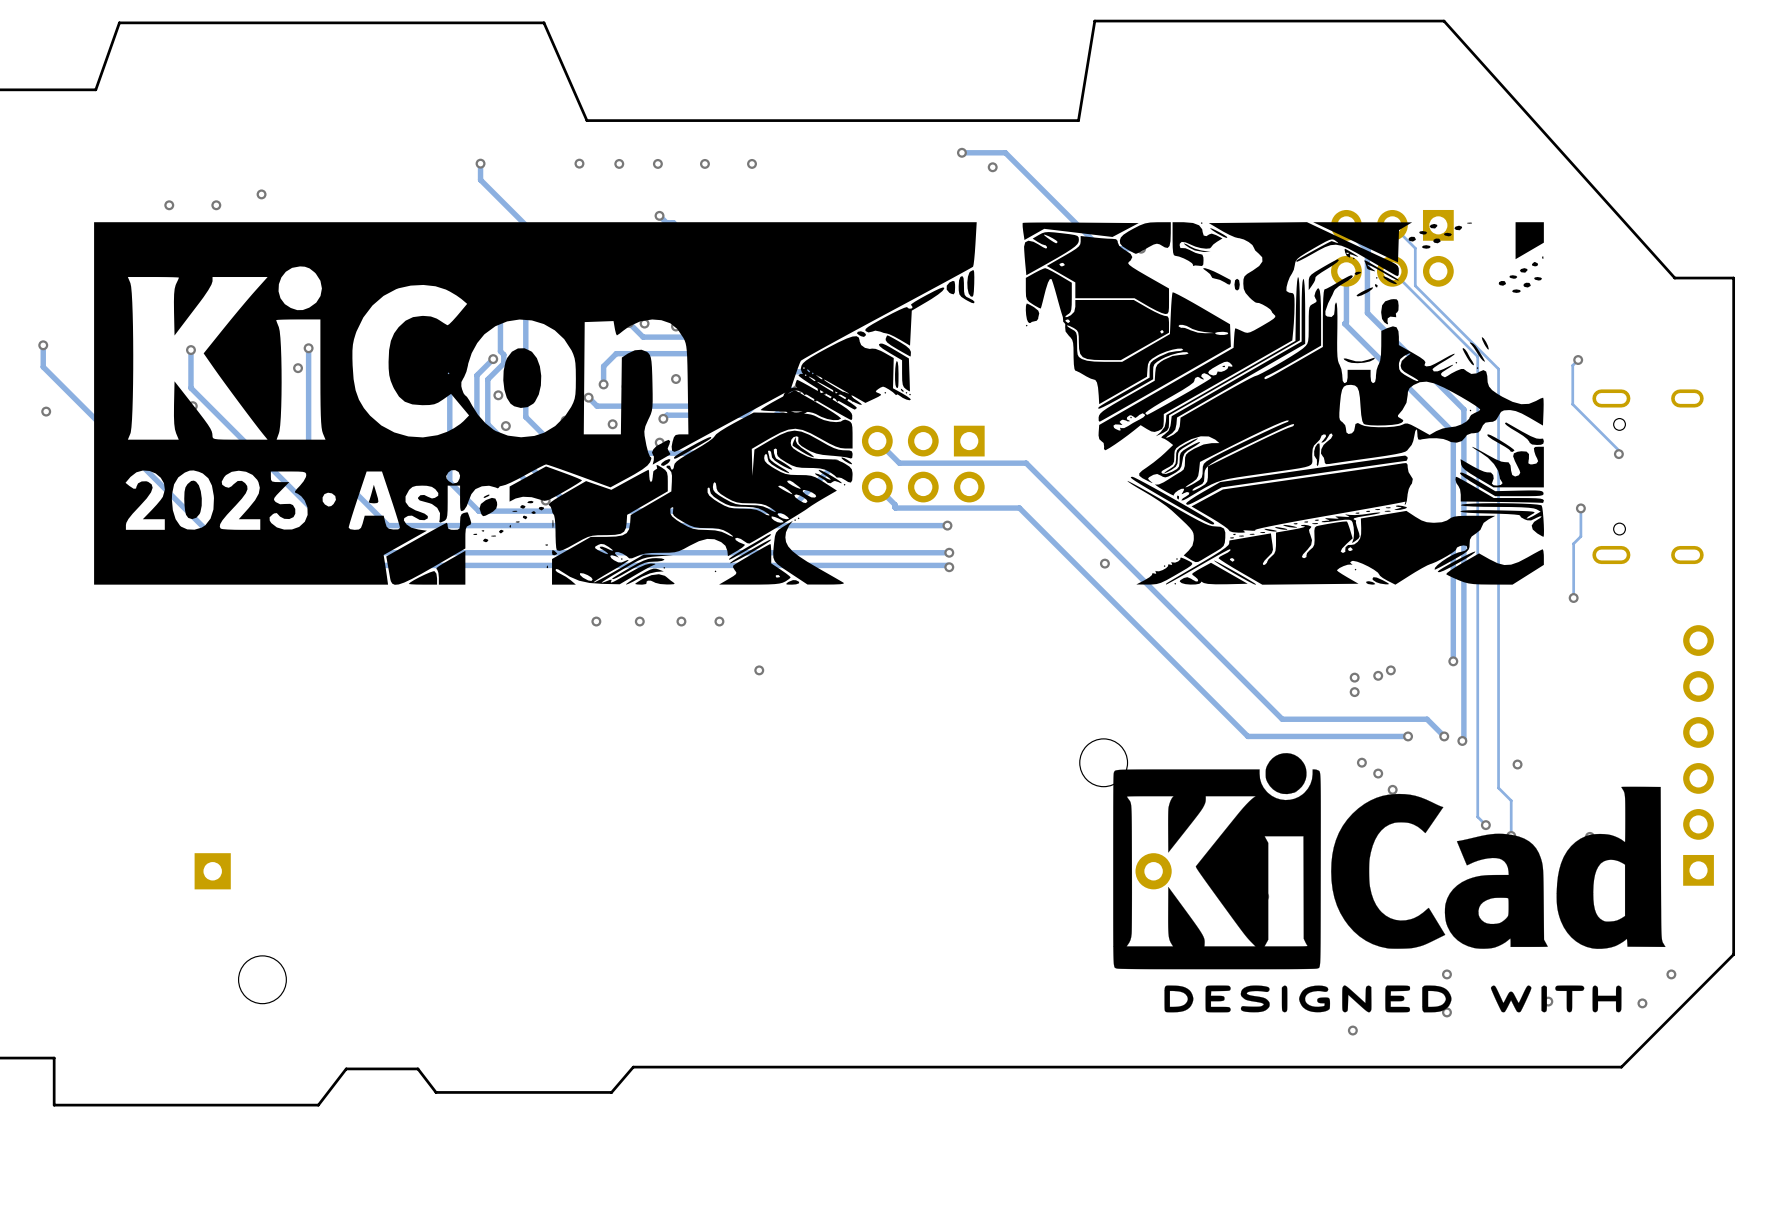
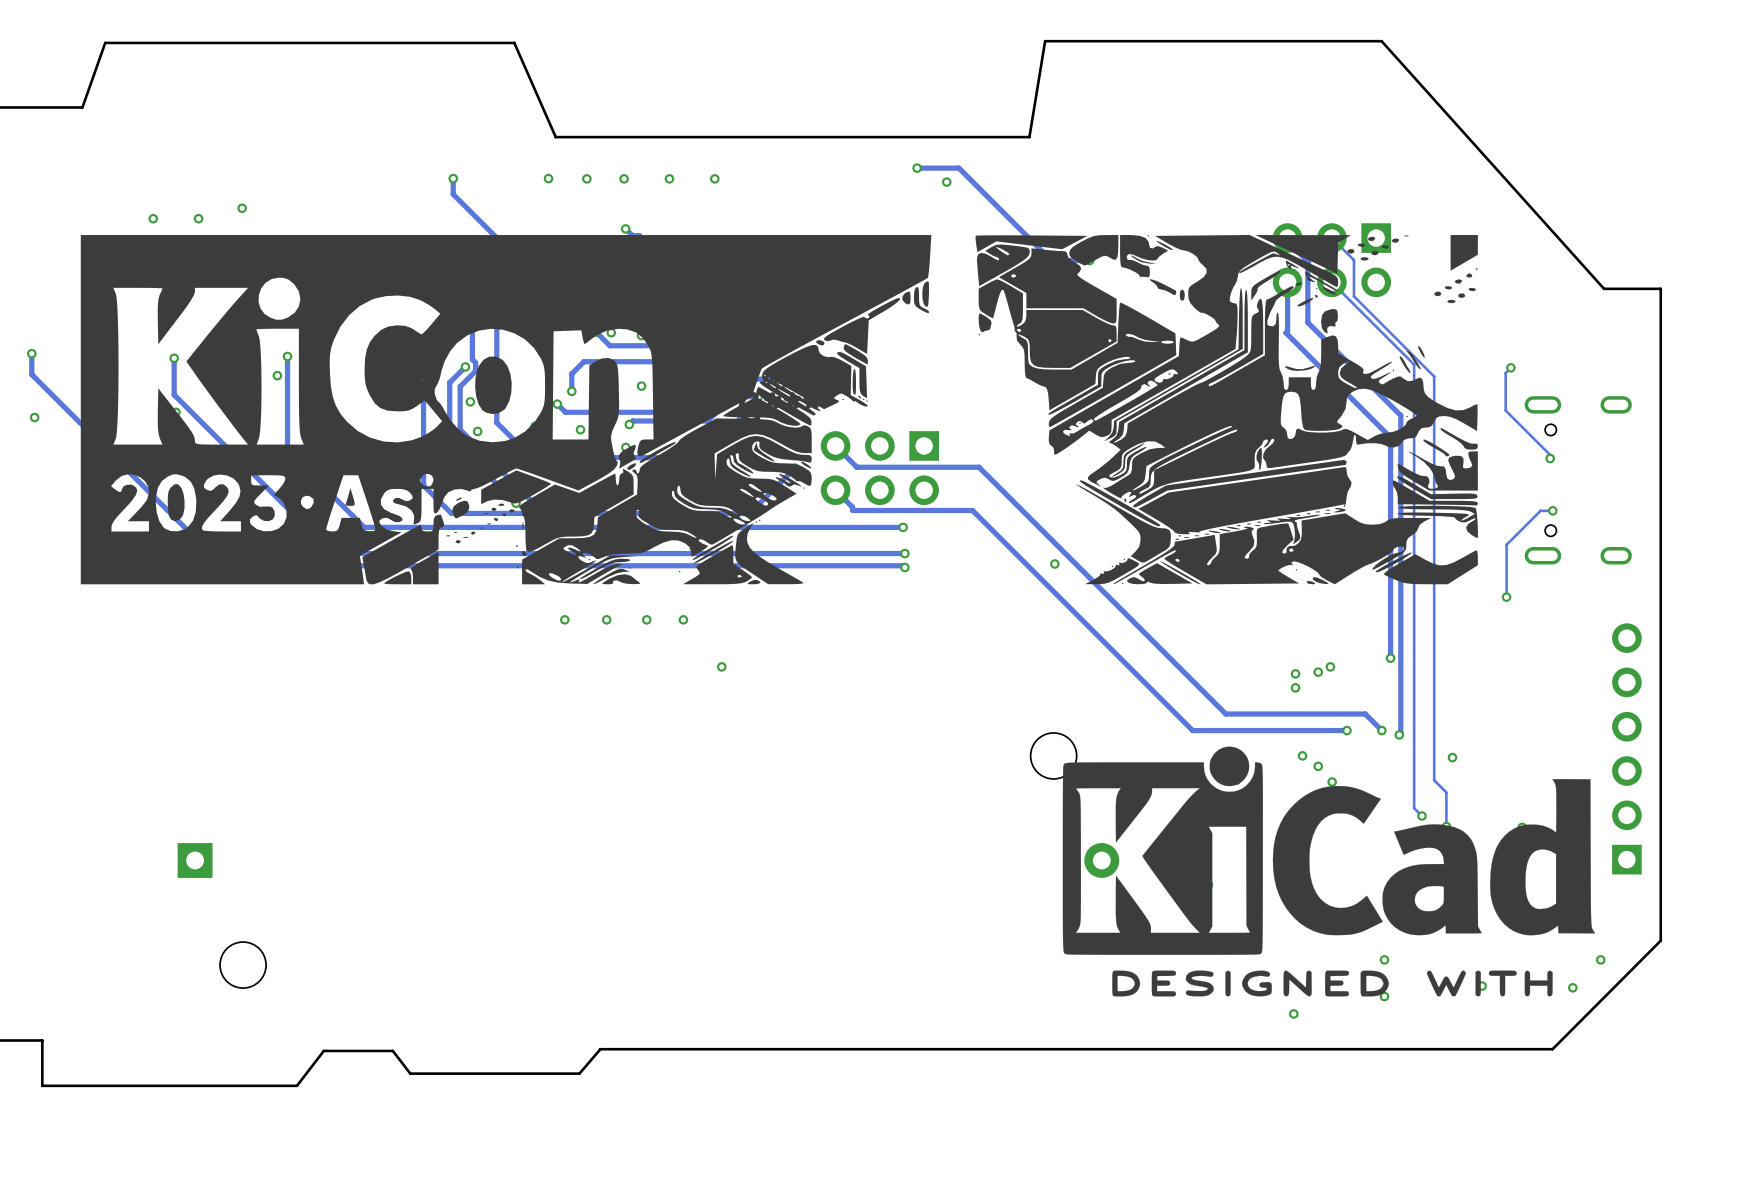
track: (1580, 508) (1580, 536) -> (1552, 510) (1540, 510) (1513, 537)
via position: (1580, 508) -> (1552, 510)

